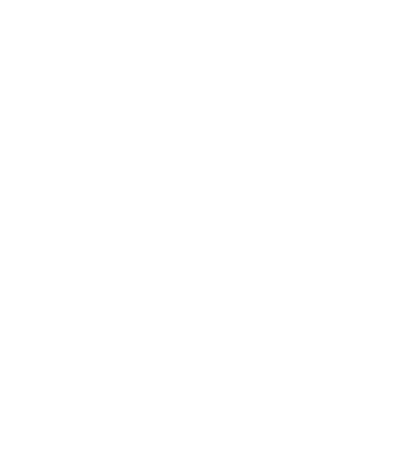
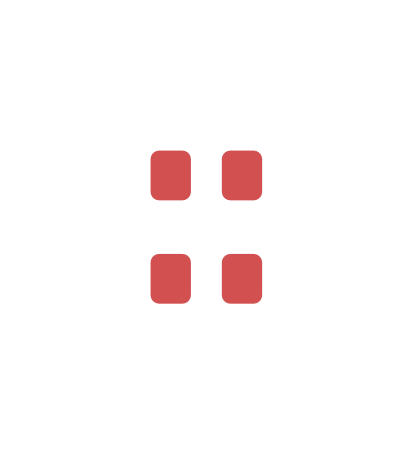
part: none -> (206, 175)
part: none -> (206, 278)

